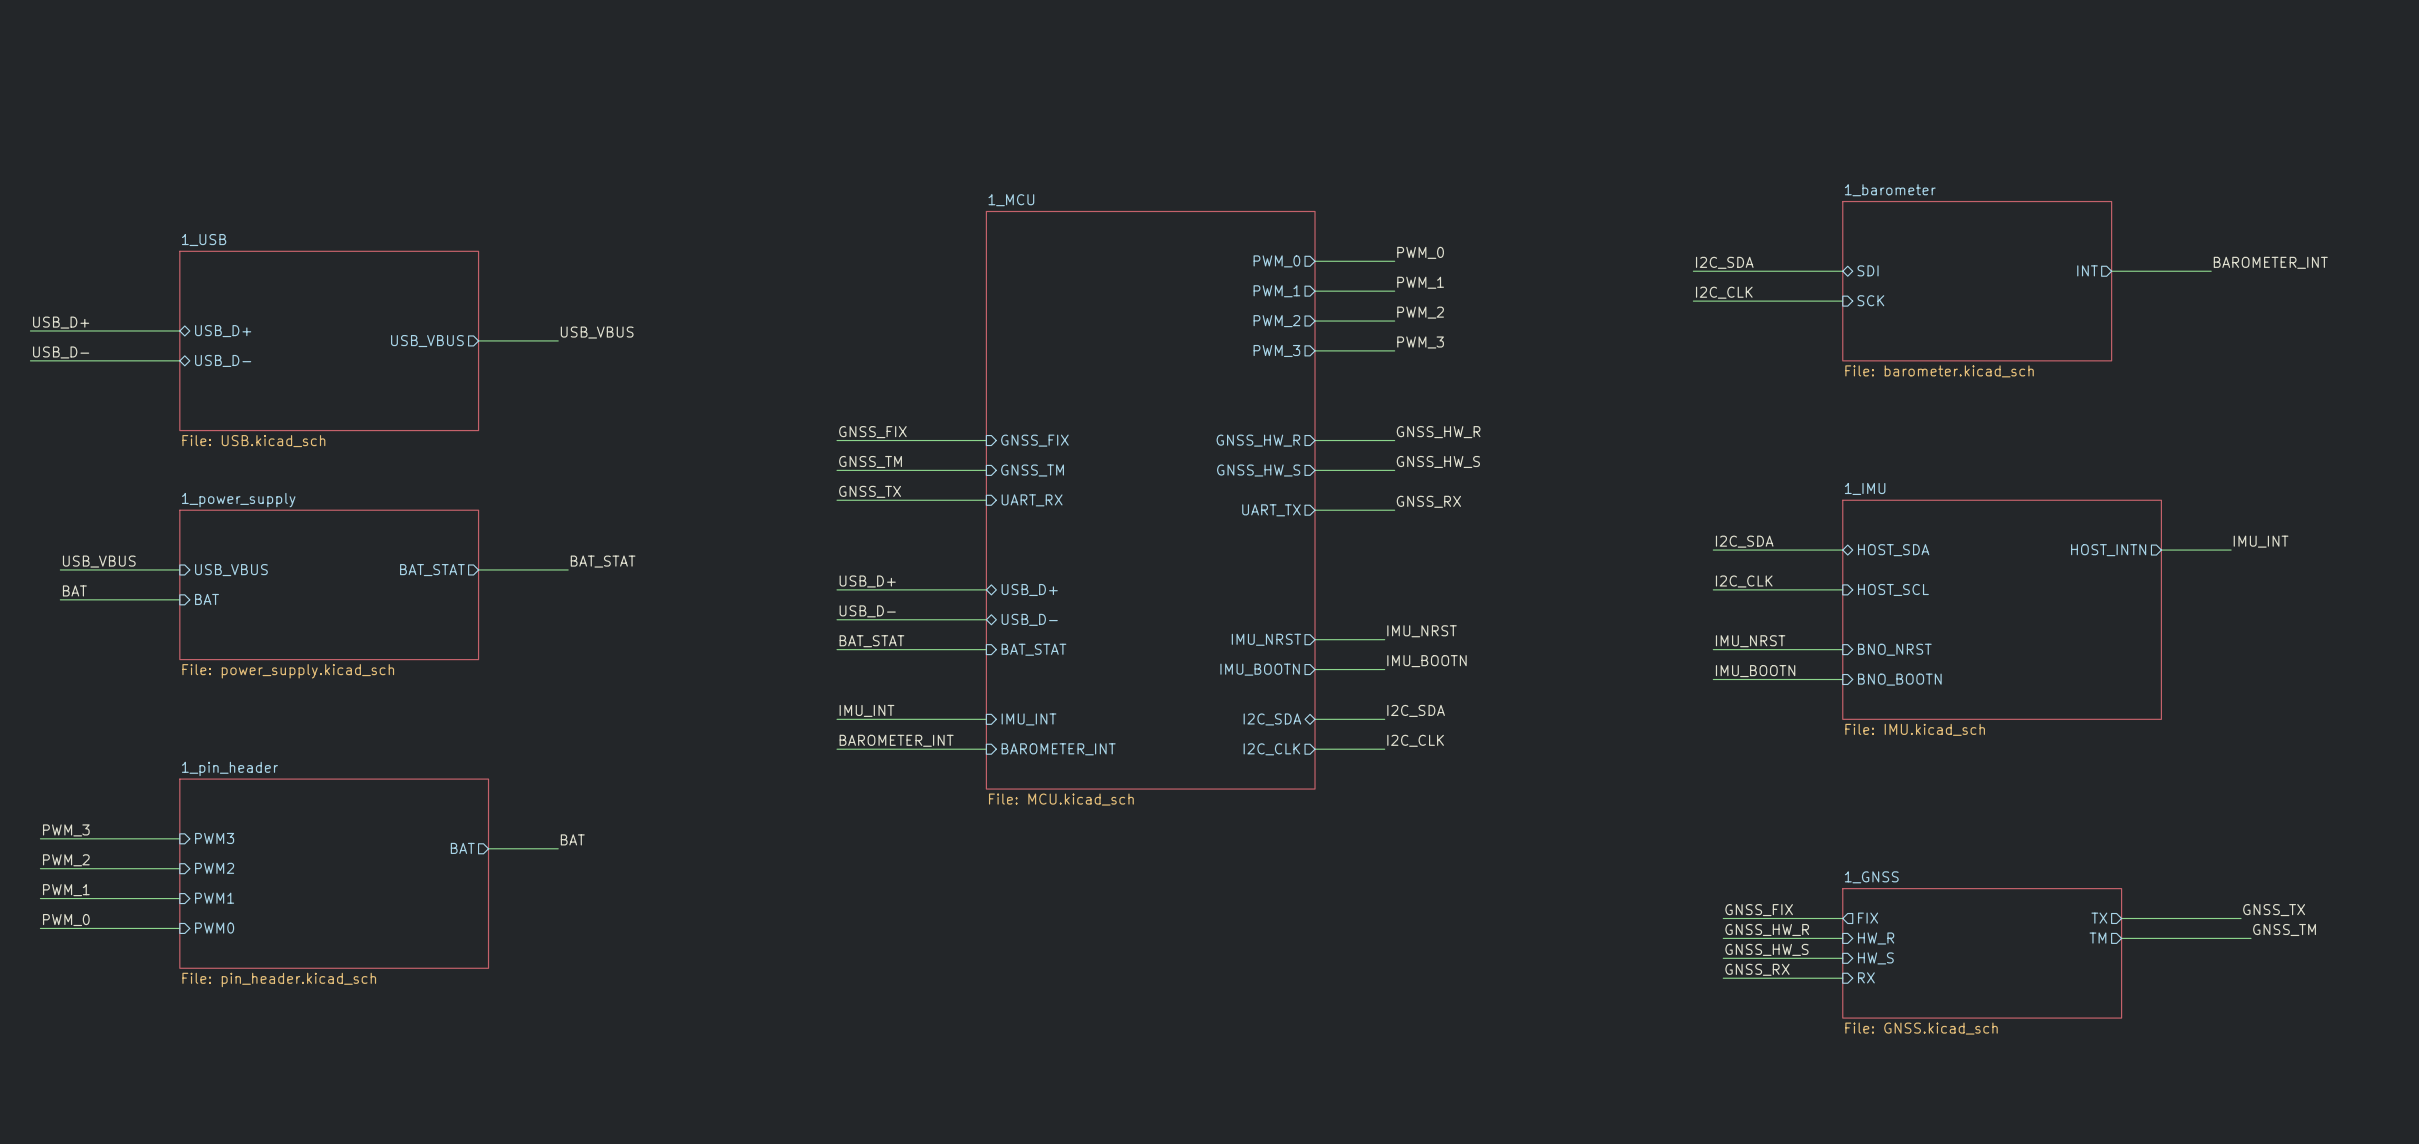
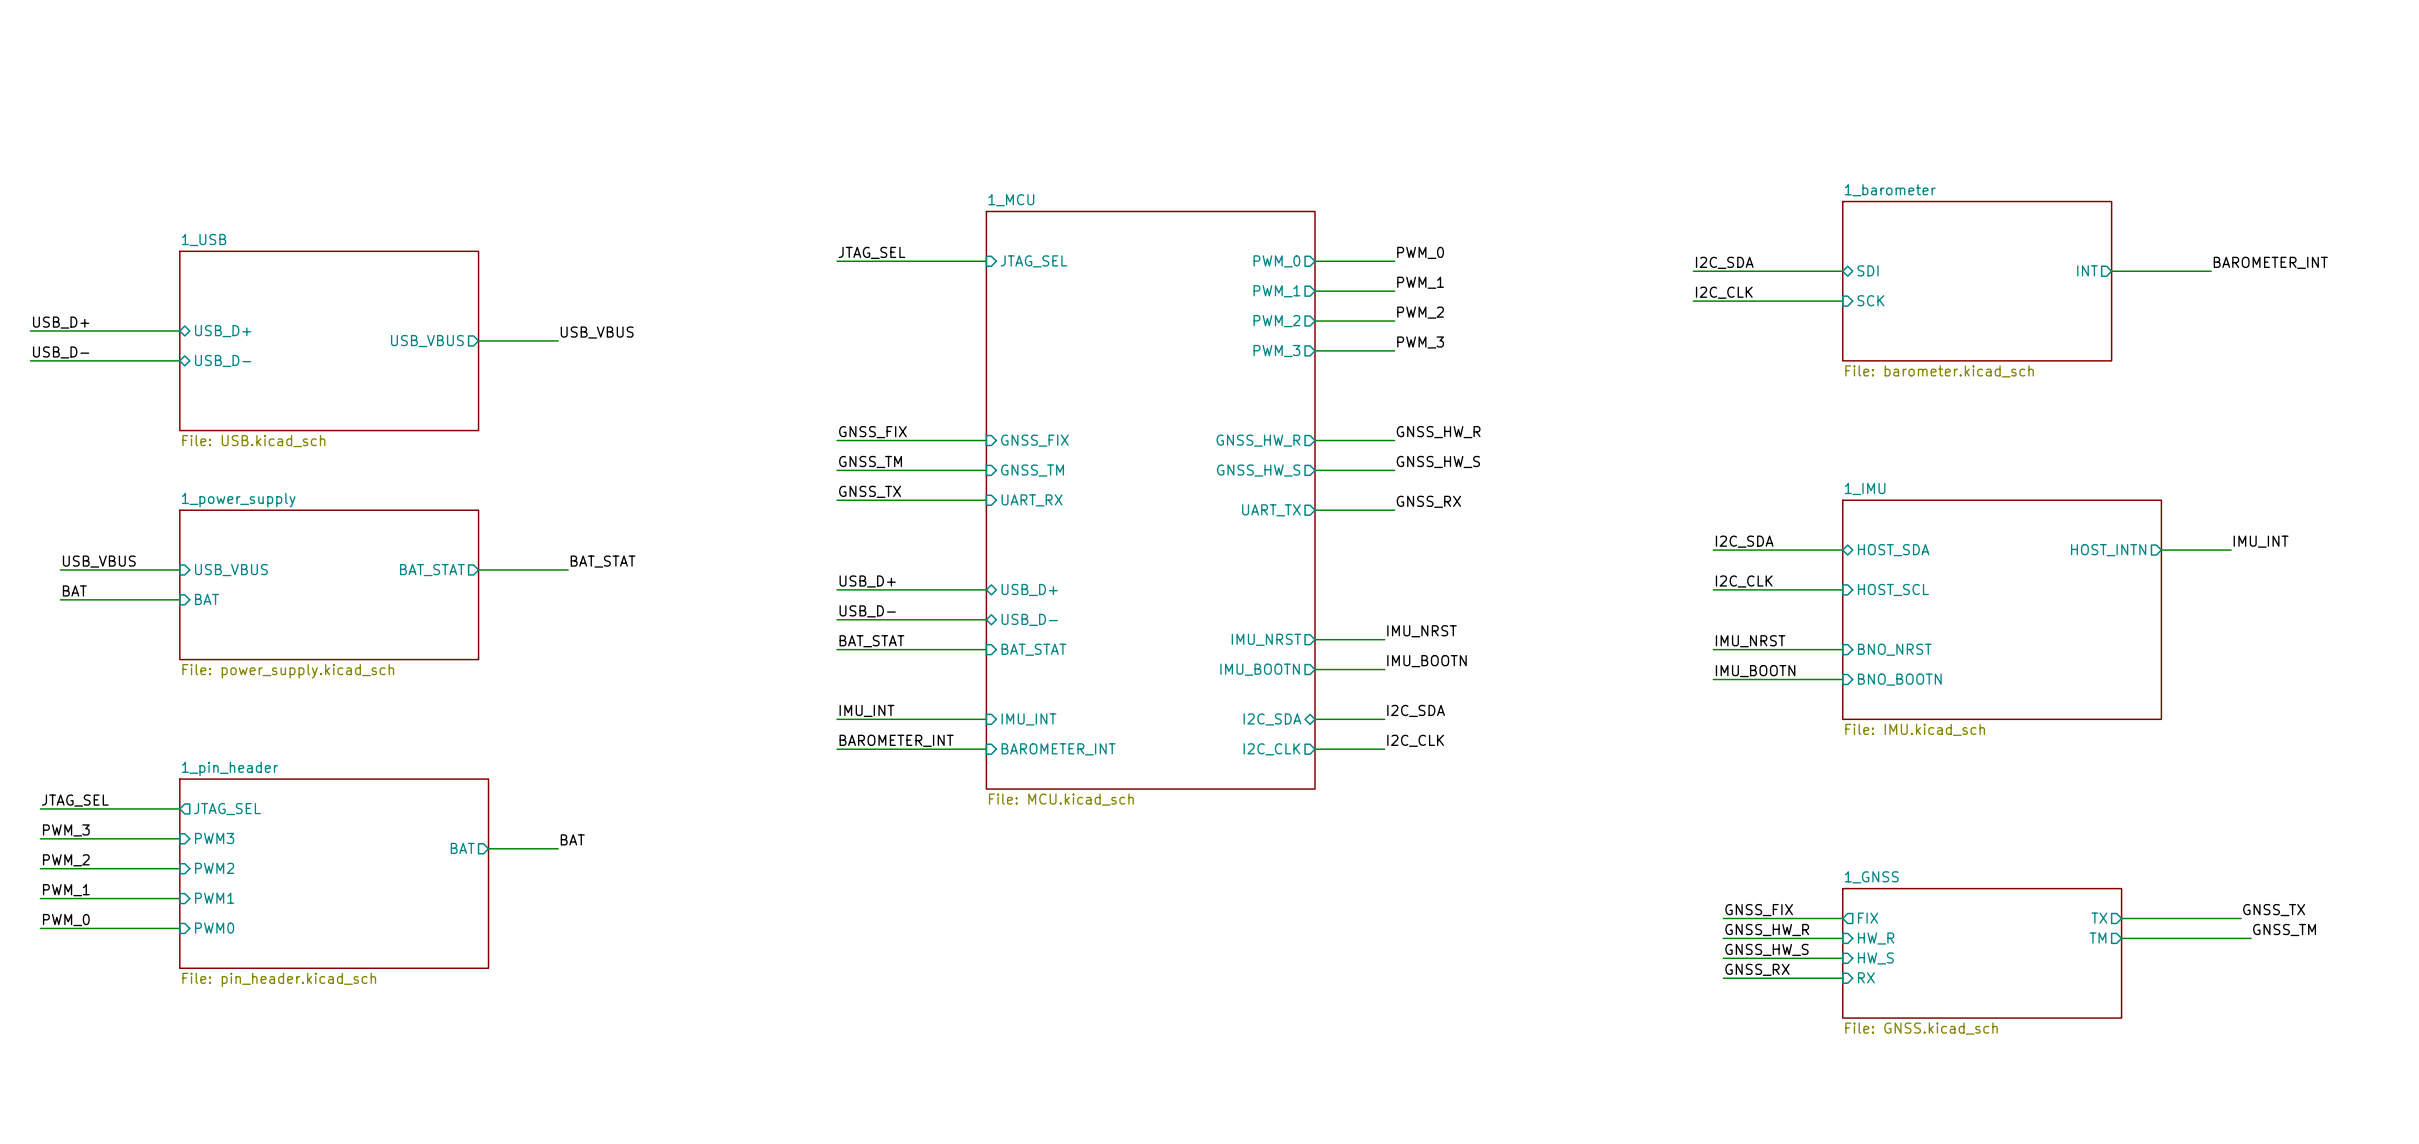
label: none -> JTAG_SEL (871, 252)
wire: none -> (837, 261) (986, 261)
sheet pin: none -> JTAG_SEL (1033, 261)
label: none -> JTAG_SEL (75, 800)
wire: none -> (40, 808) (179, 808)
sheet pin: none -> JTAG_SEL (227, 809)

